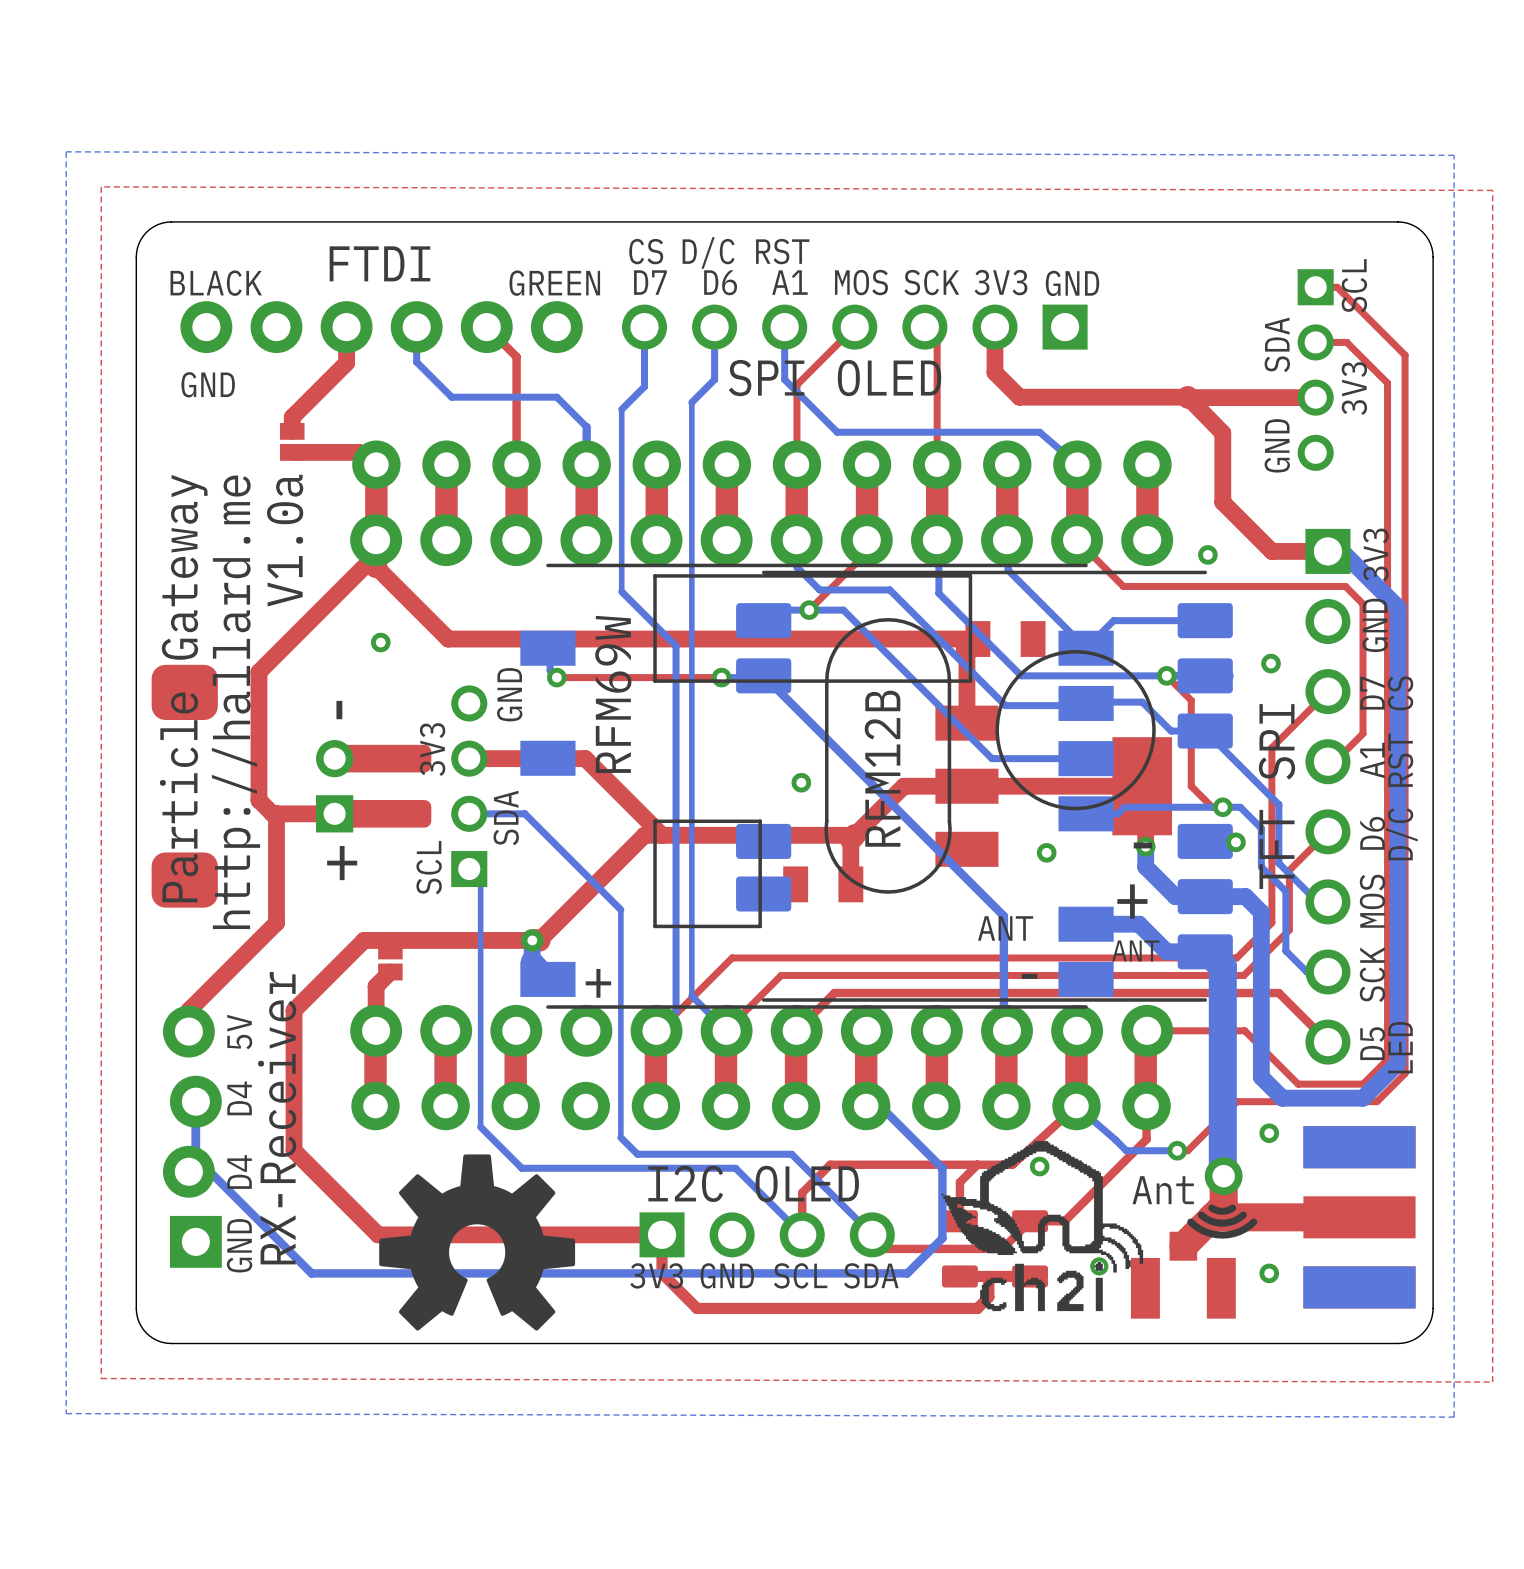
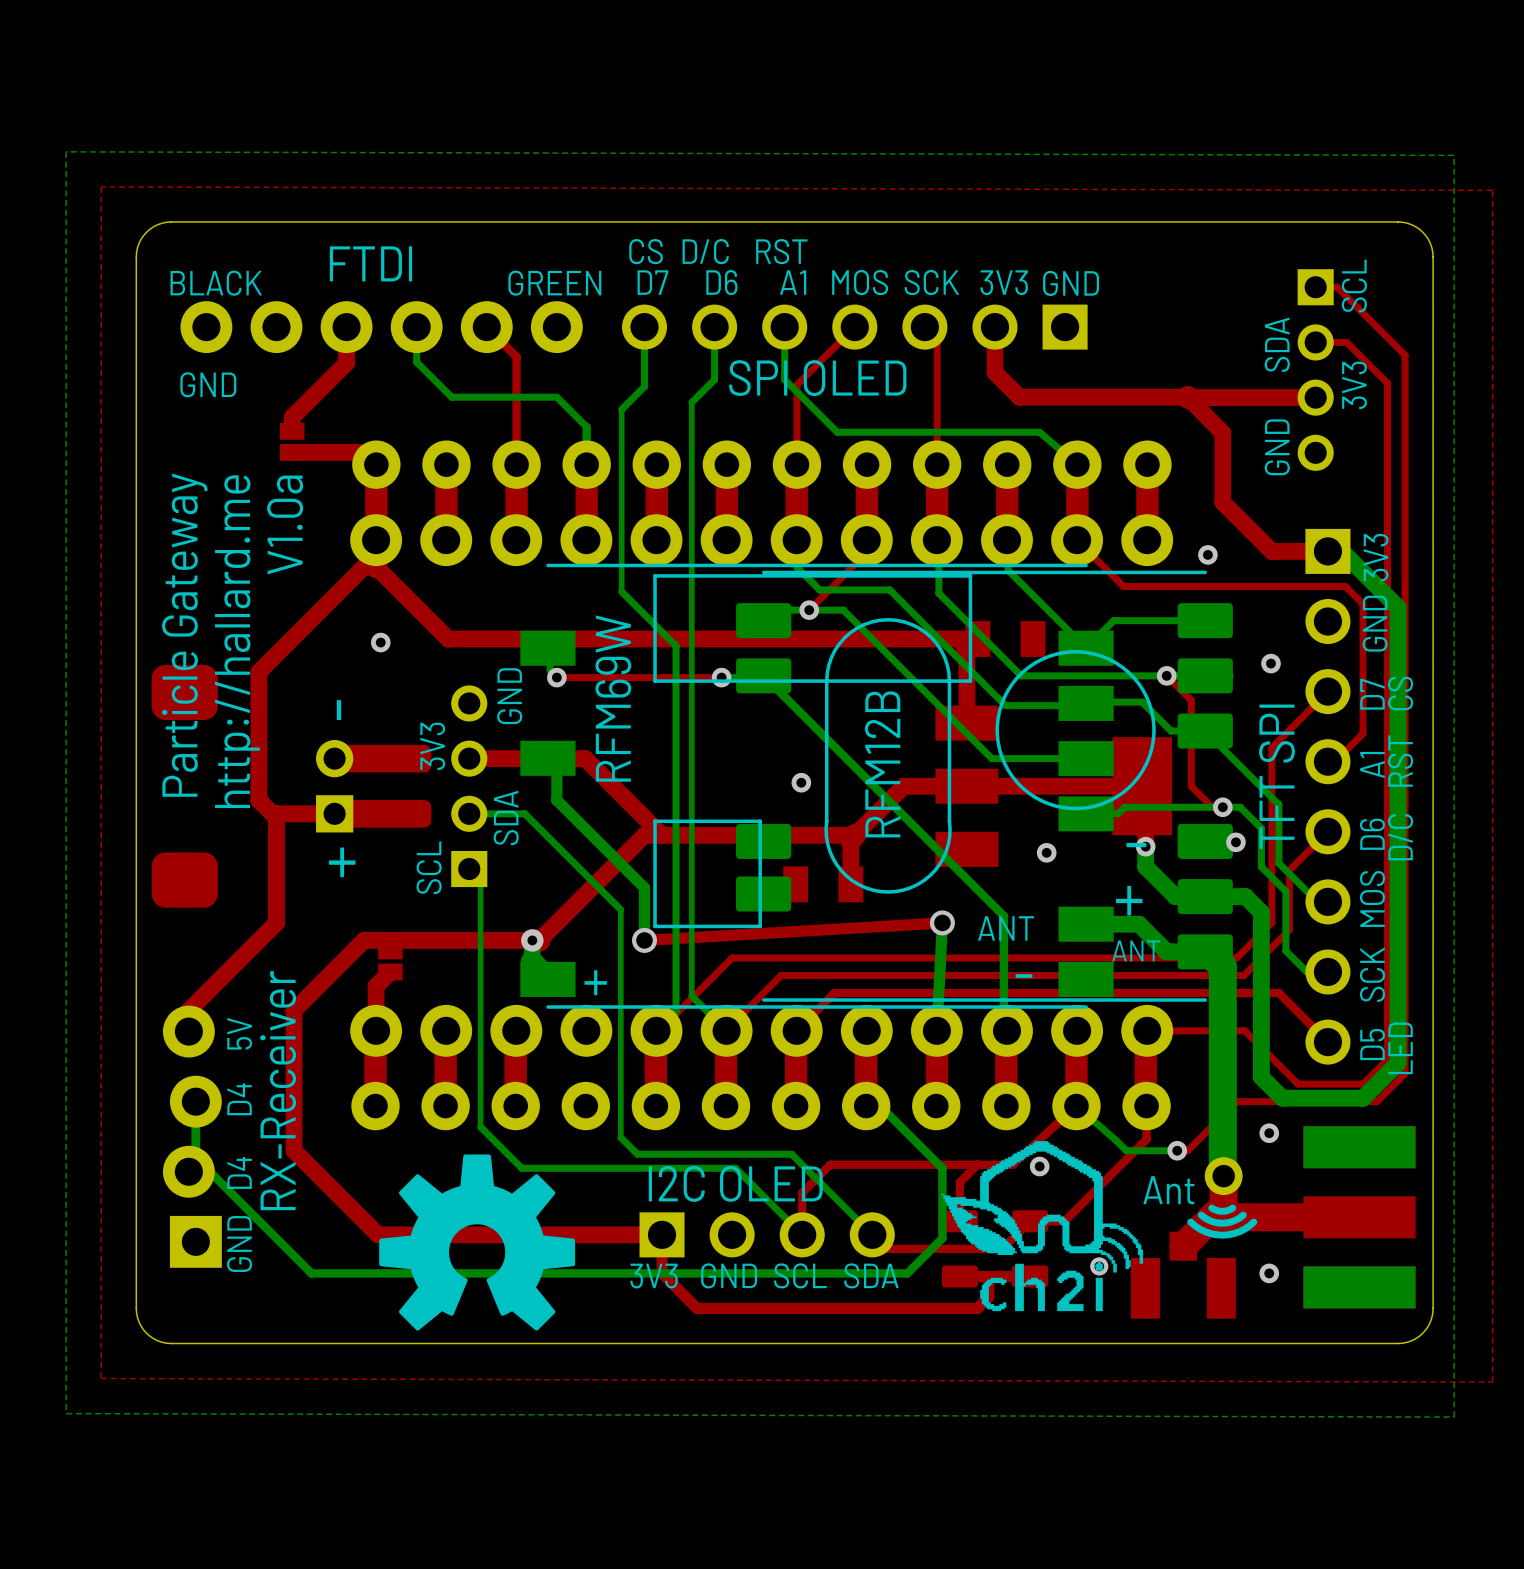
bottom track: none -> (547, 758) (556, 758) (556, 800) (644, 887) (644, 940)
top track: none -> (942, 922) (644, 940)
bottom track: none -> (942, 922) (936, 1030)
via: none -> (942, 922)
via: none -> (644, 940)

